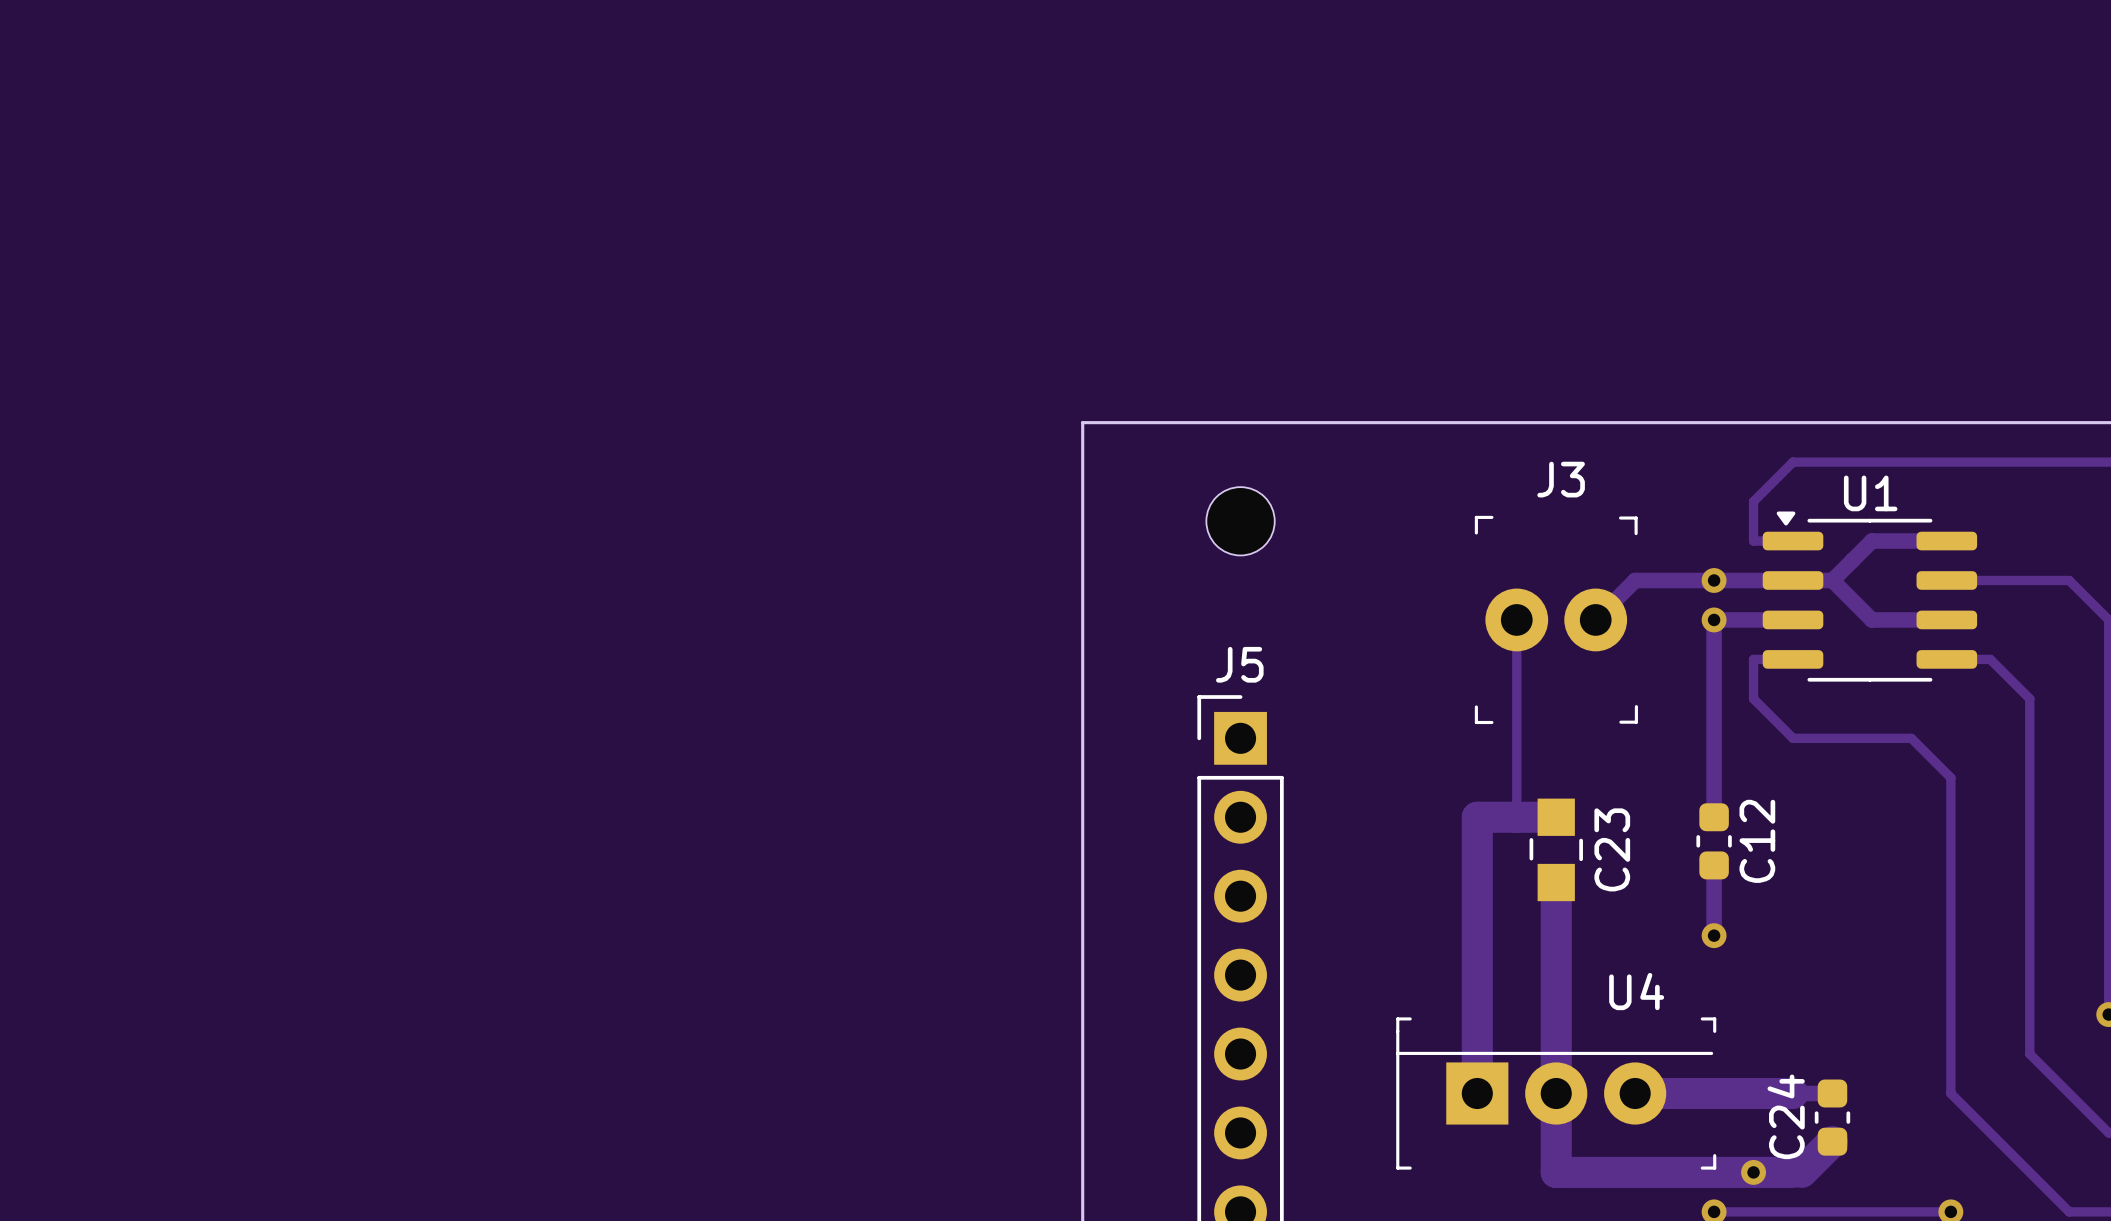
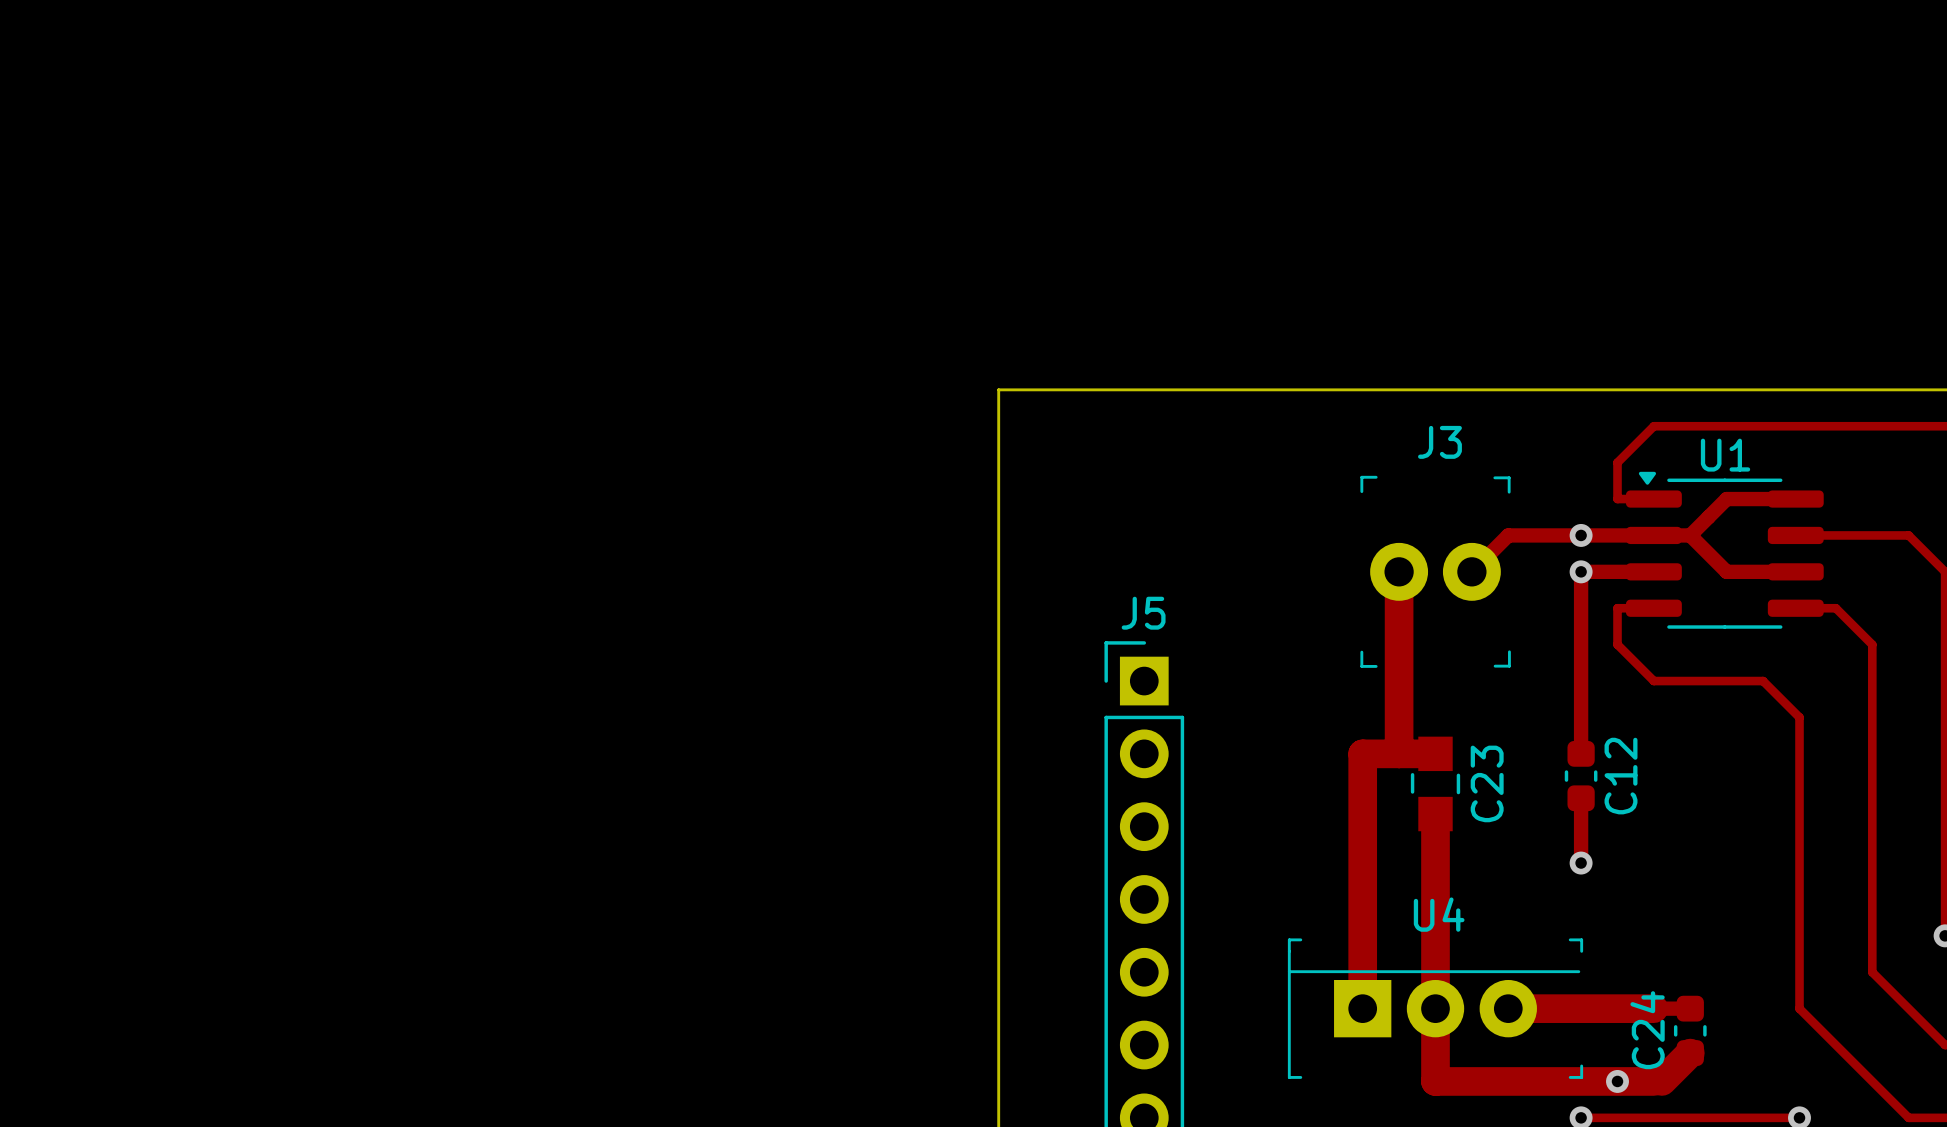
part: (1240, 521) -> none
track width: thin (1516, 619) (1516, 817) -> thick (1399, 571) (1399, 753)
U4 name position: U4 (1636, 991) -> U4 (1439, 914)

